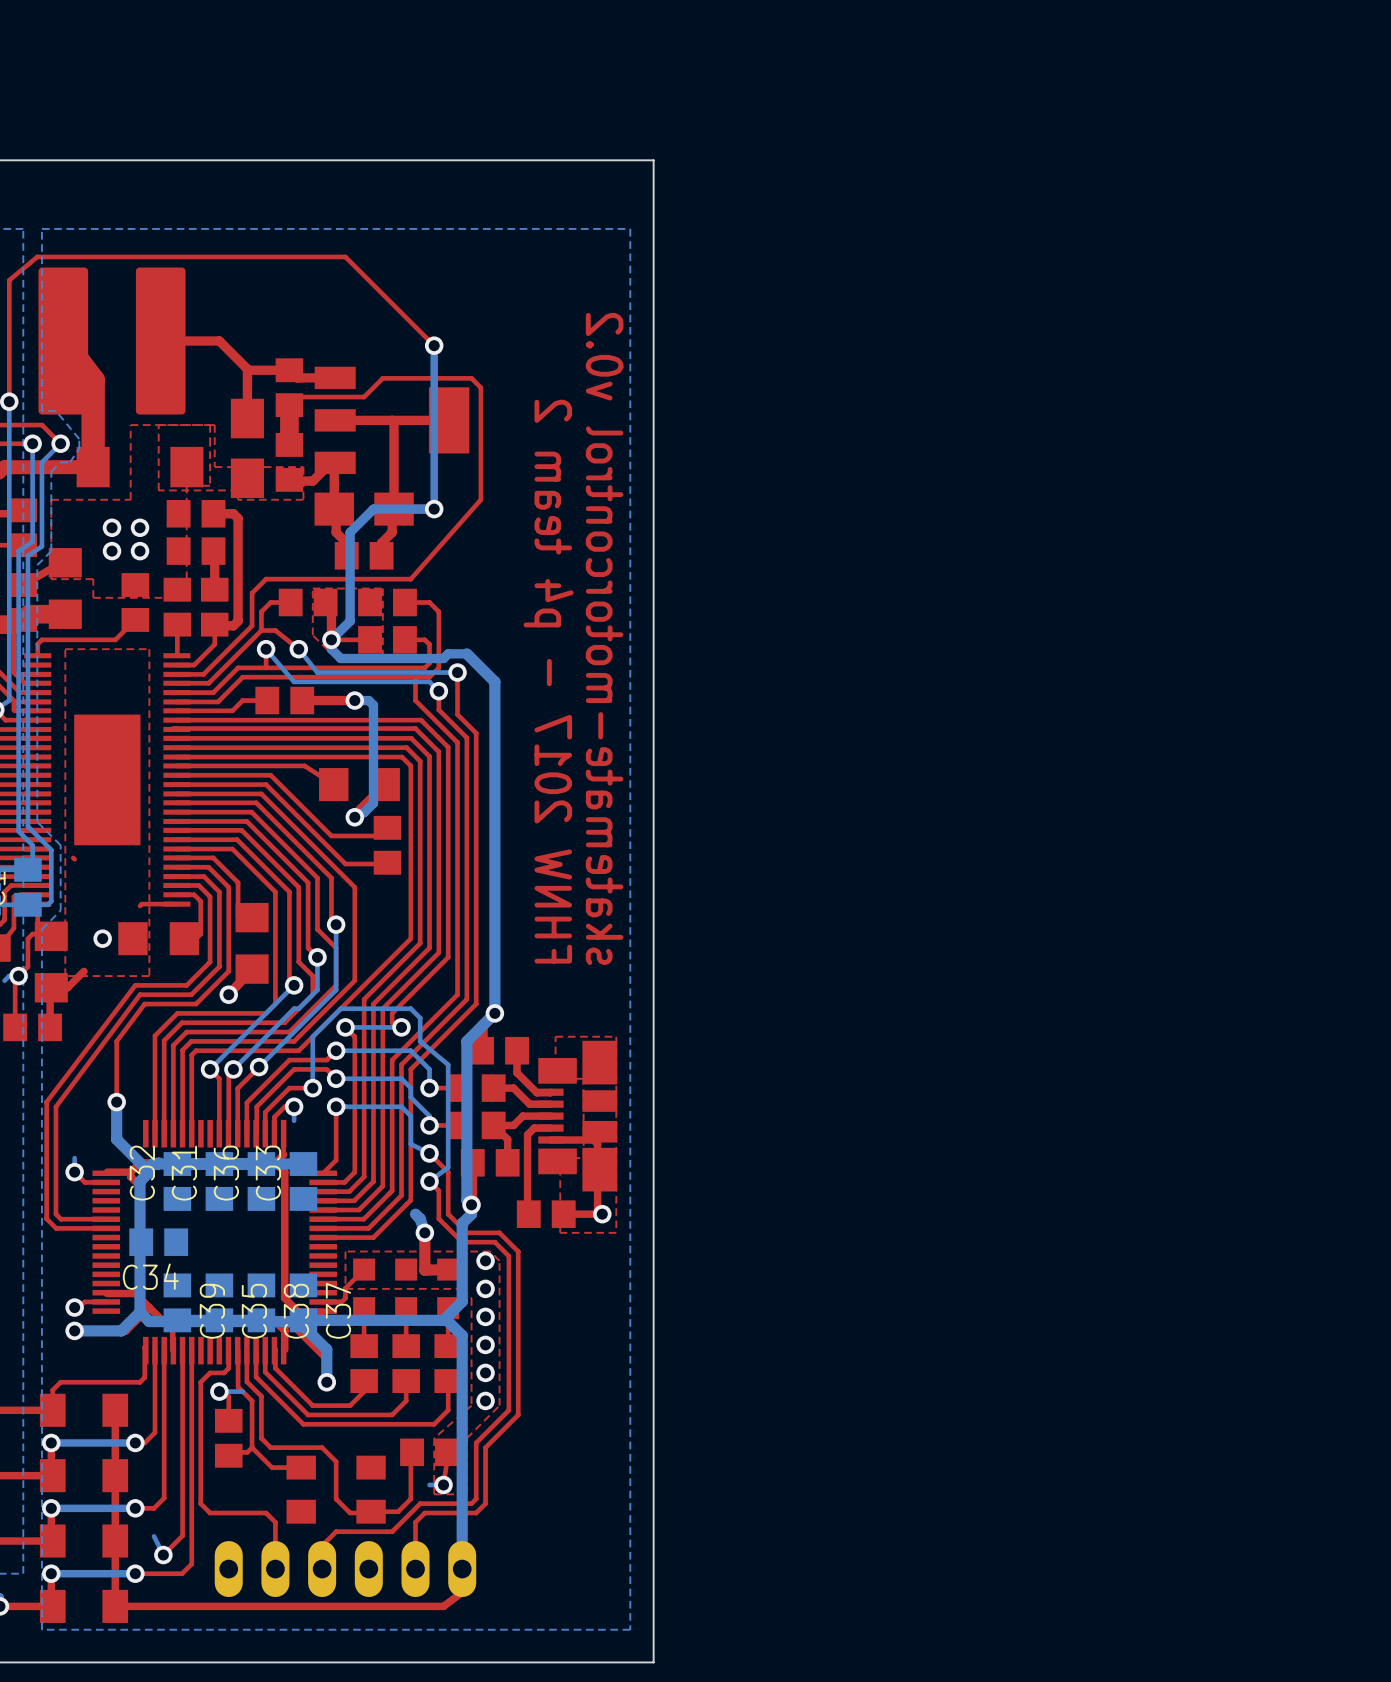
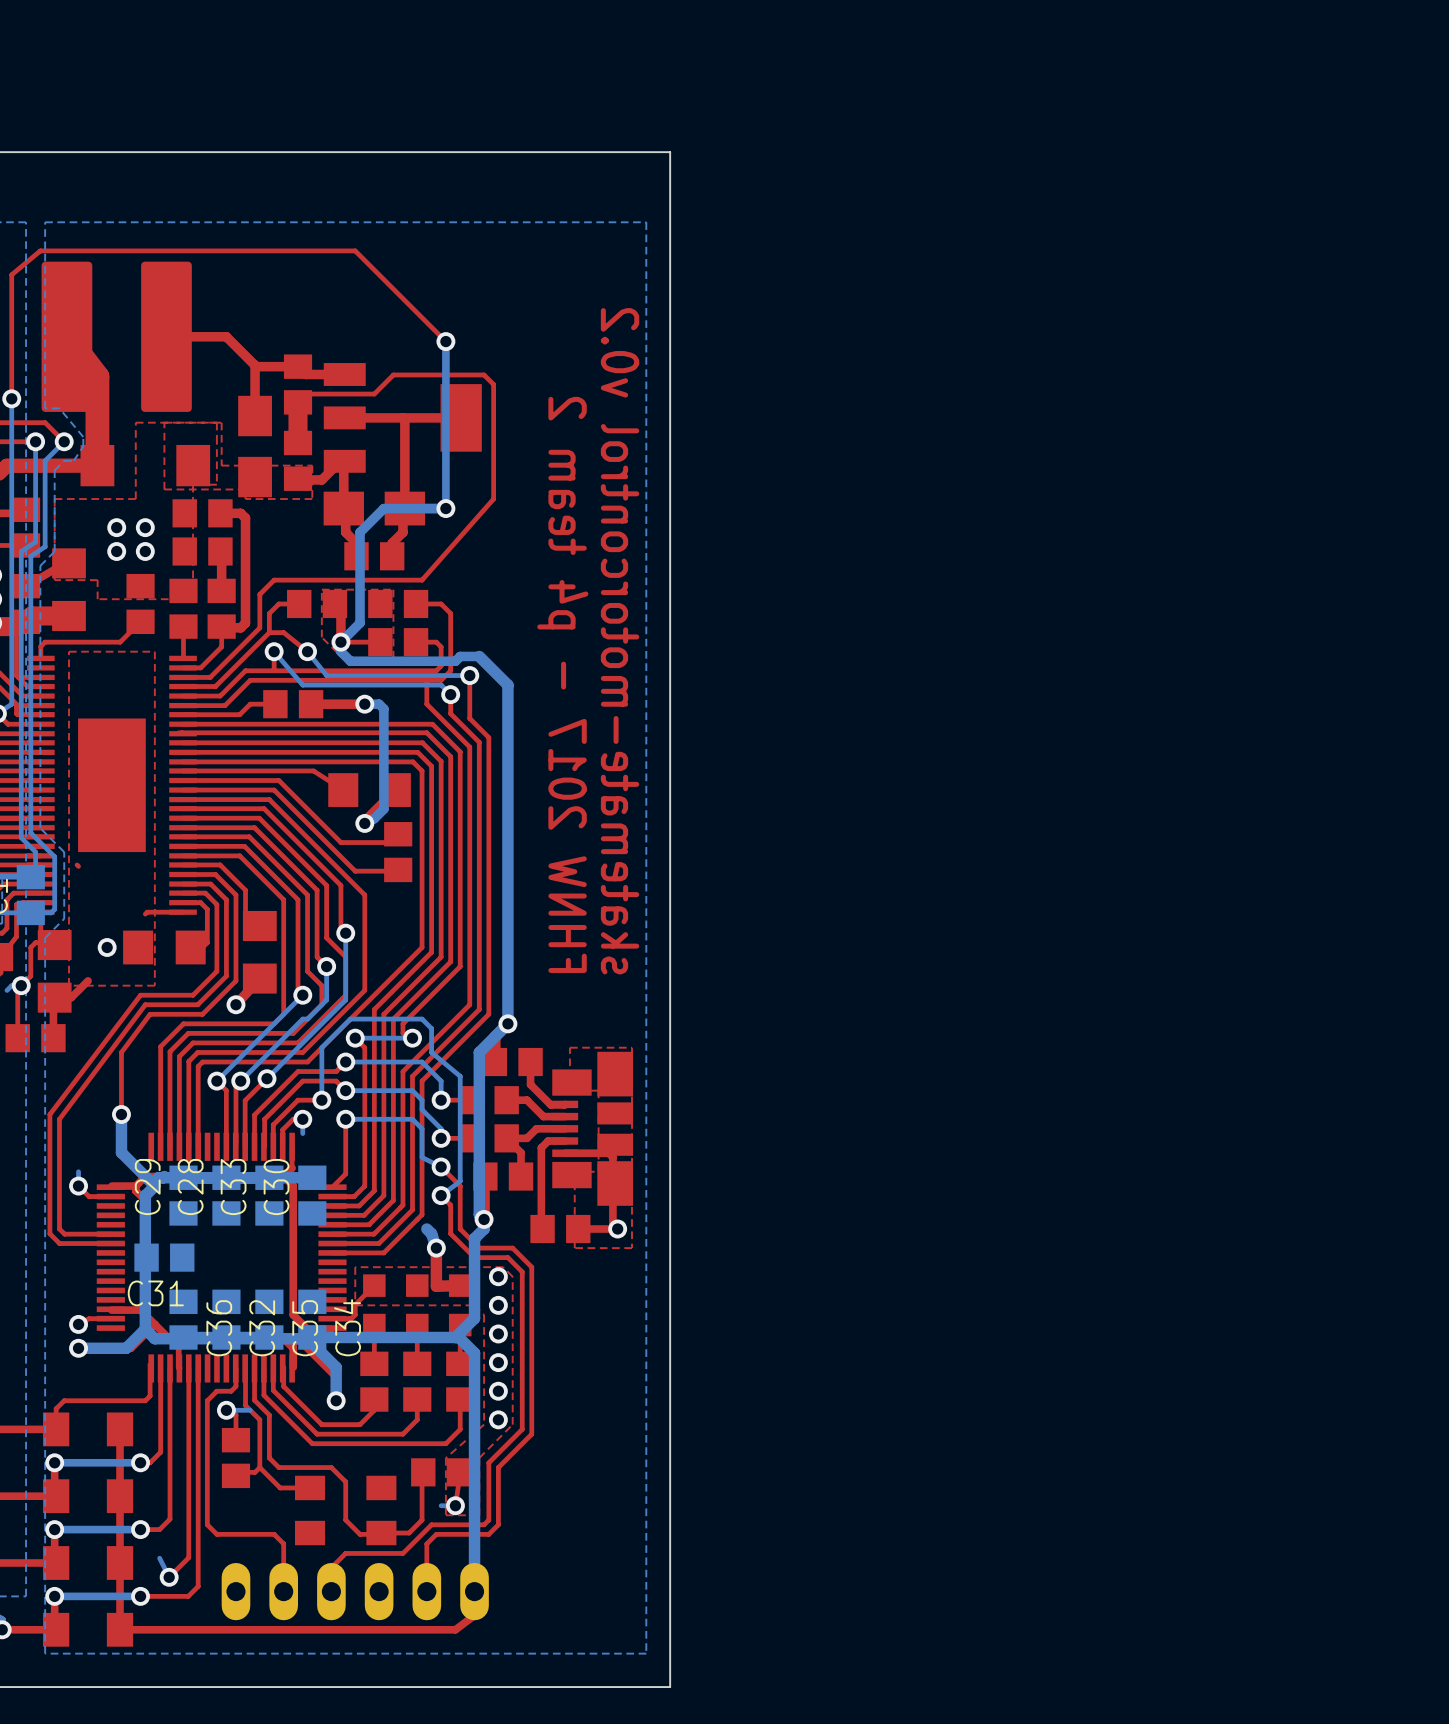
C32 name: C32 (142, 1173) -> C29 (147, 1187)
C31 name: C31 (184, 1173) -> C28 (190, 1187)
C36 name: C36 (226, 1173) -> C33 (233, 1187)
C33 name: C33 (268, 1173) -> C30 (276, 1187)
C34 name: C34 (150, 1276) -> C31 (155, 1293)
C37 name: C37 (338, 1310) -> C34 (347, 1327)
C39 name: C39 (212, 1311) -> C36 (219, 1328)
C35 name: C35 (254, 1311) -> C32 (262, 1328)
C38 name: C38 (296, 1311) -> C35 (305, 1328)

